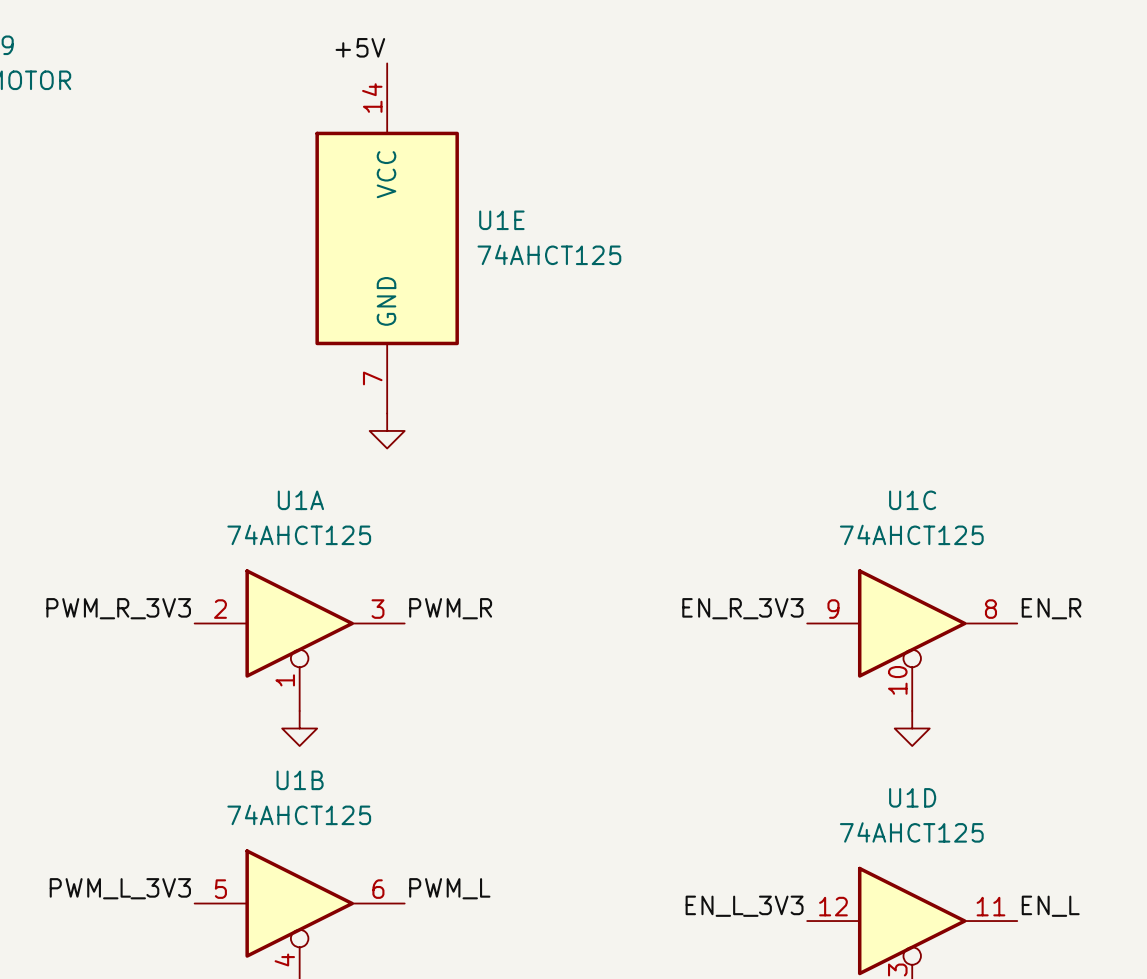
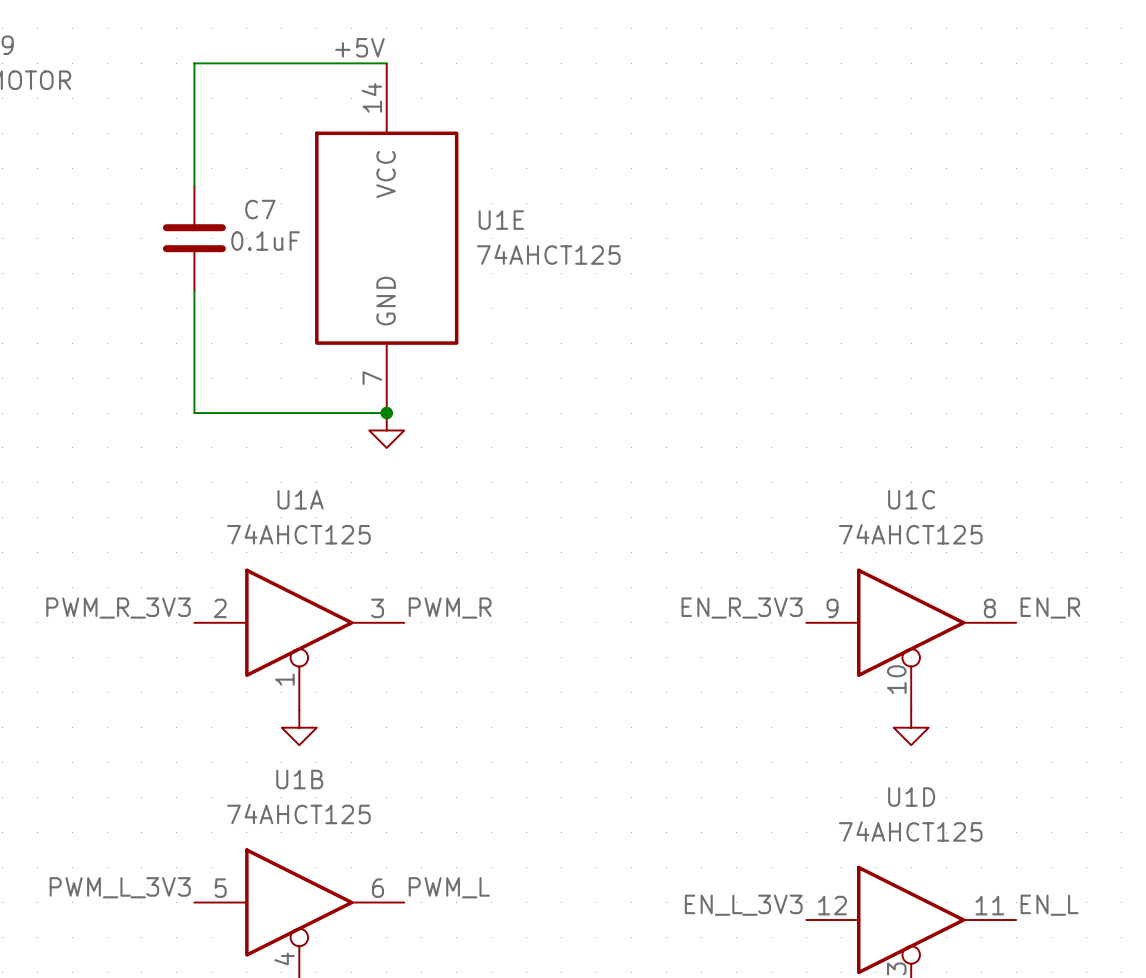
wire: none -> (386, 63) (194, 63) (194, 185)
C7: none -> 0.1uF (194, 238)
wire: none -> (194, 290) (194, 413) (386, 413)
junction: none -> (386, 413)

